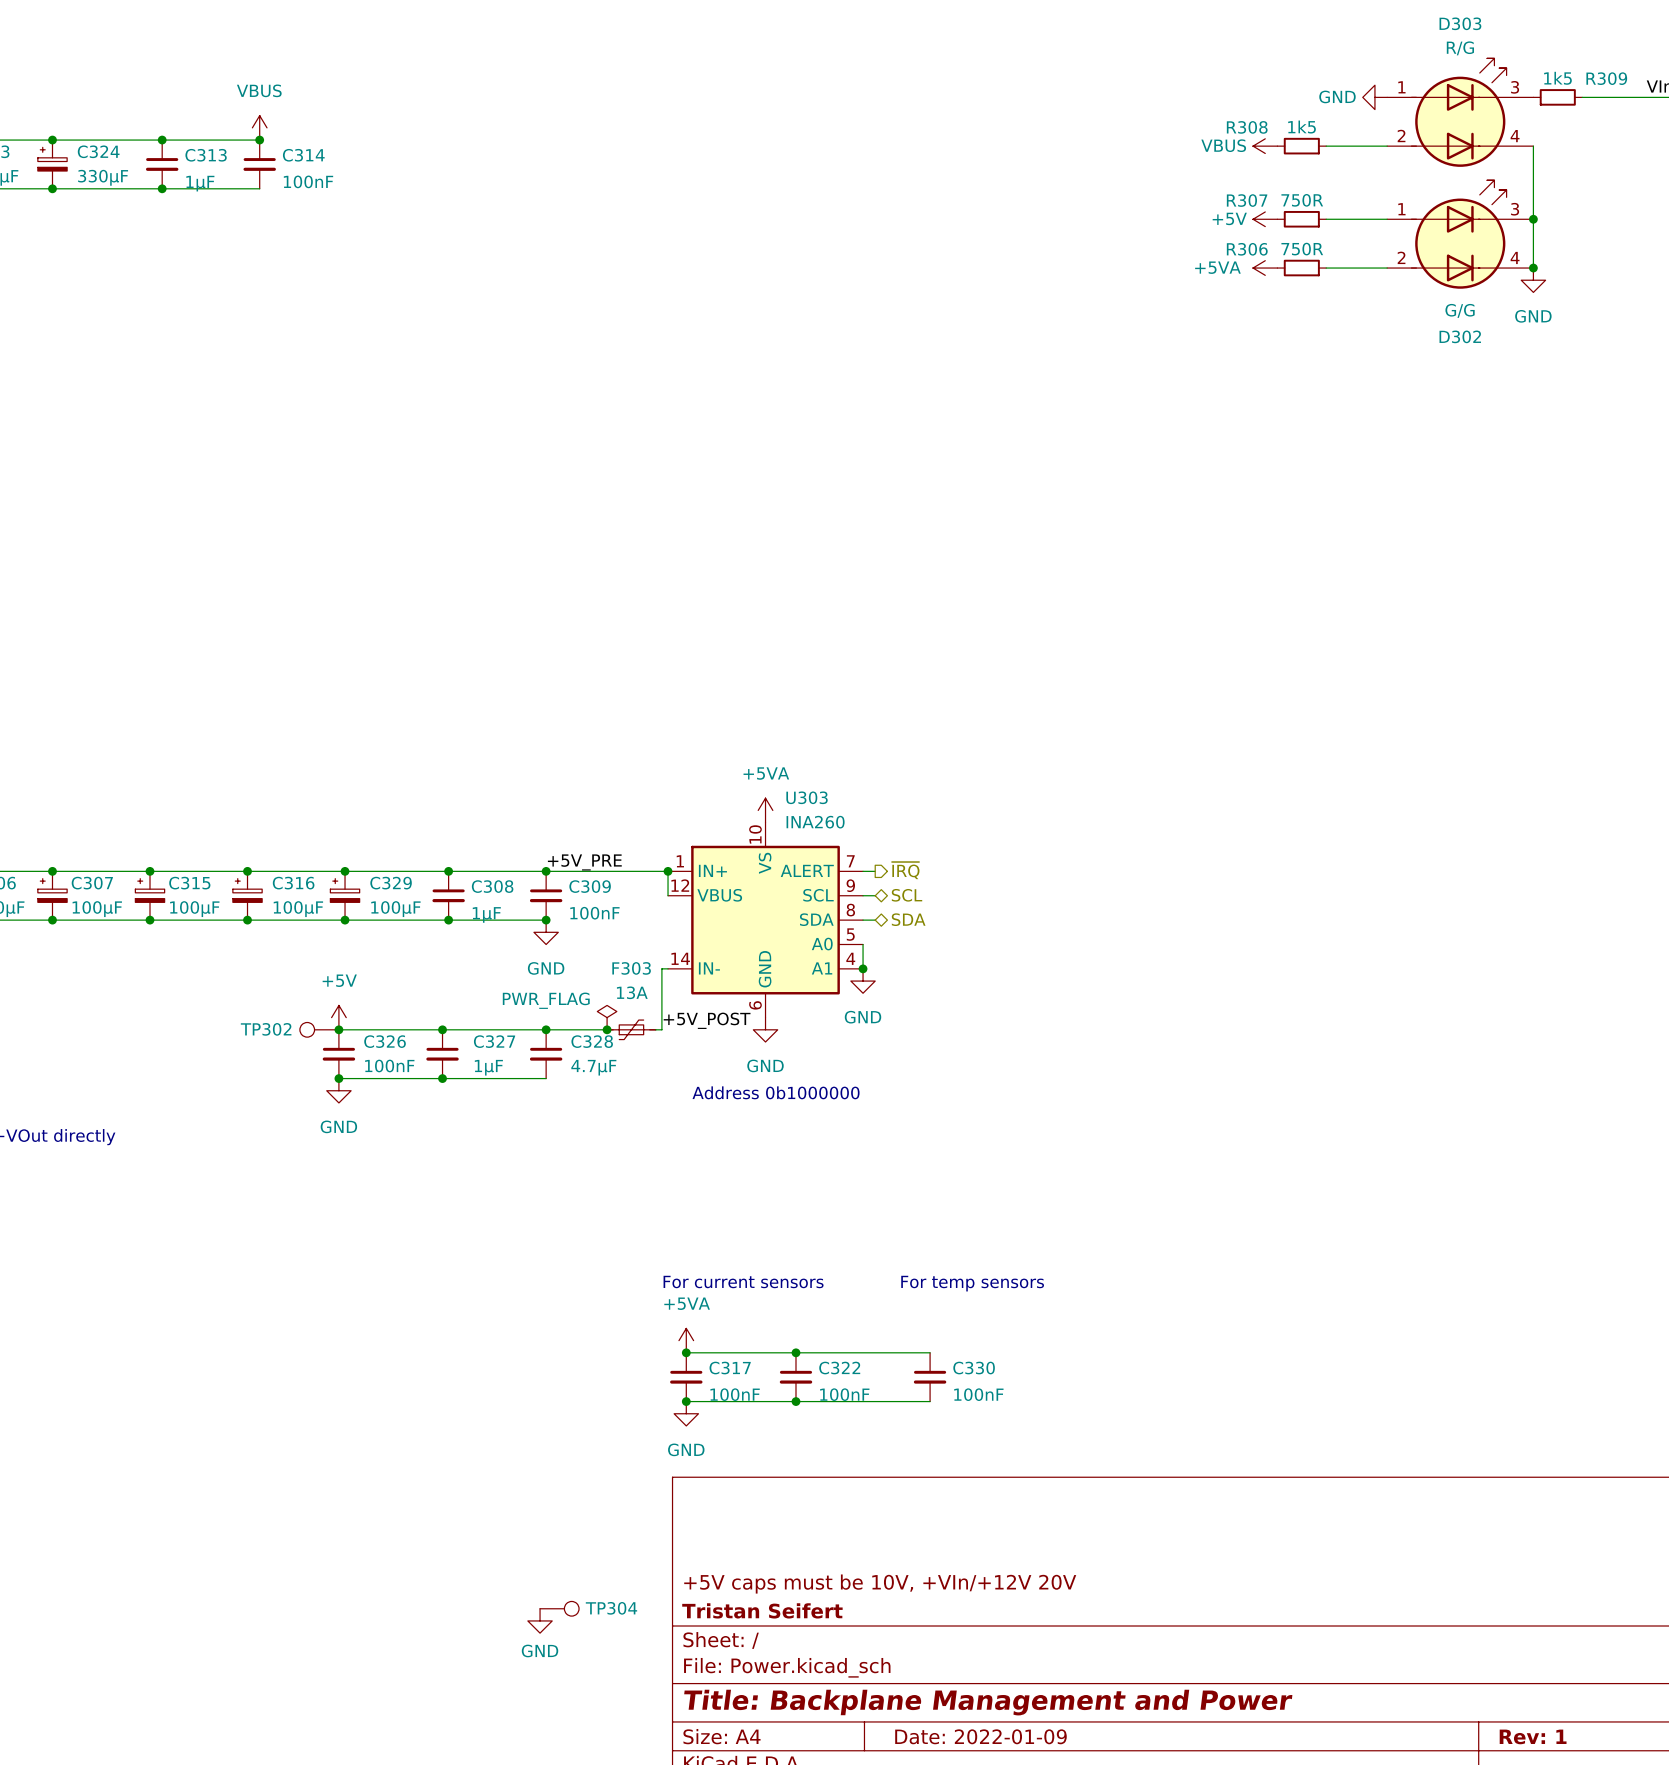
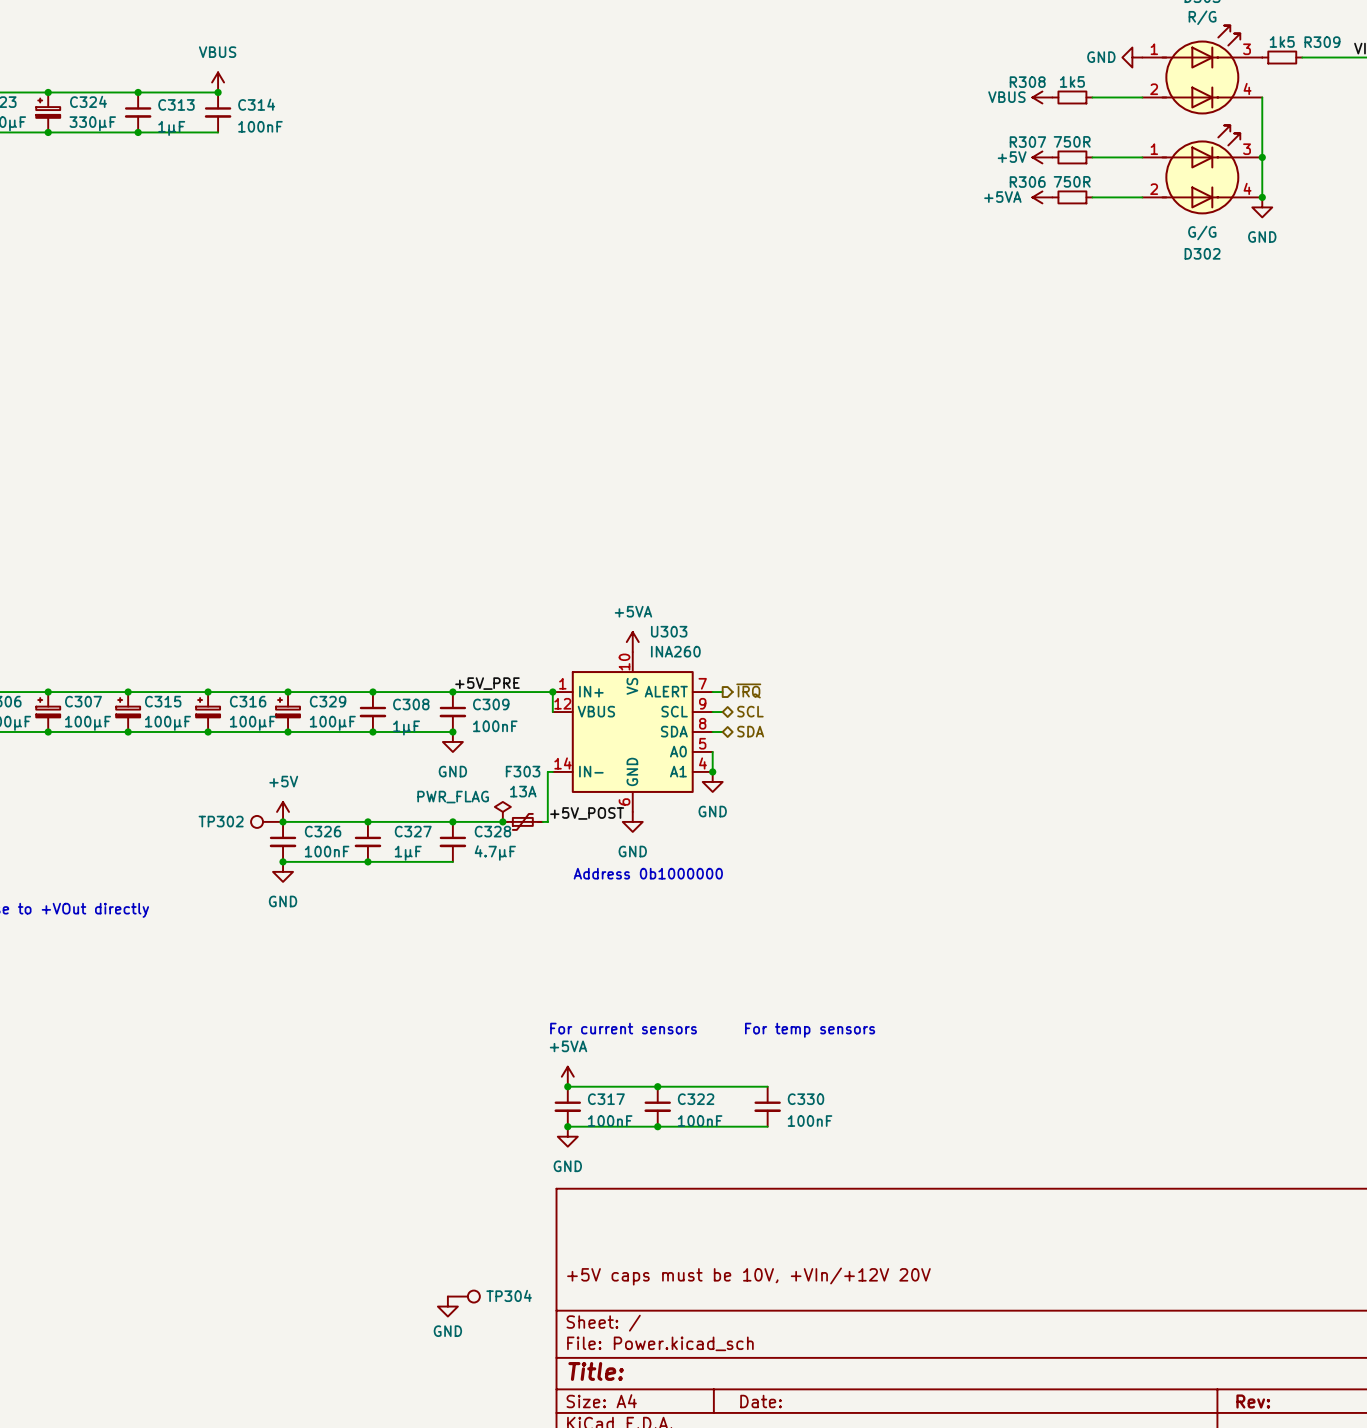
title block: Tristan Seifert (762, 1610) -> none
title block: Title: Backplane Management and Power (988, 1702) -> Title: (596, 1371)
title block: Date: 2022-01-09 (980, 1736) -> Date: (761, 1401)
title block: Rev: 1 (1533, 1736) -> Rev: (1253, 1401)

